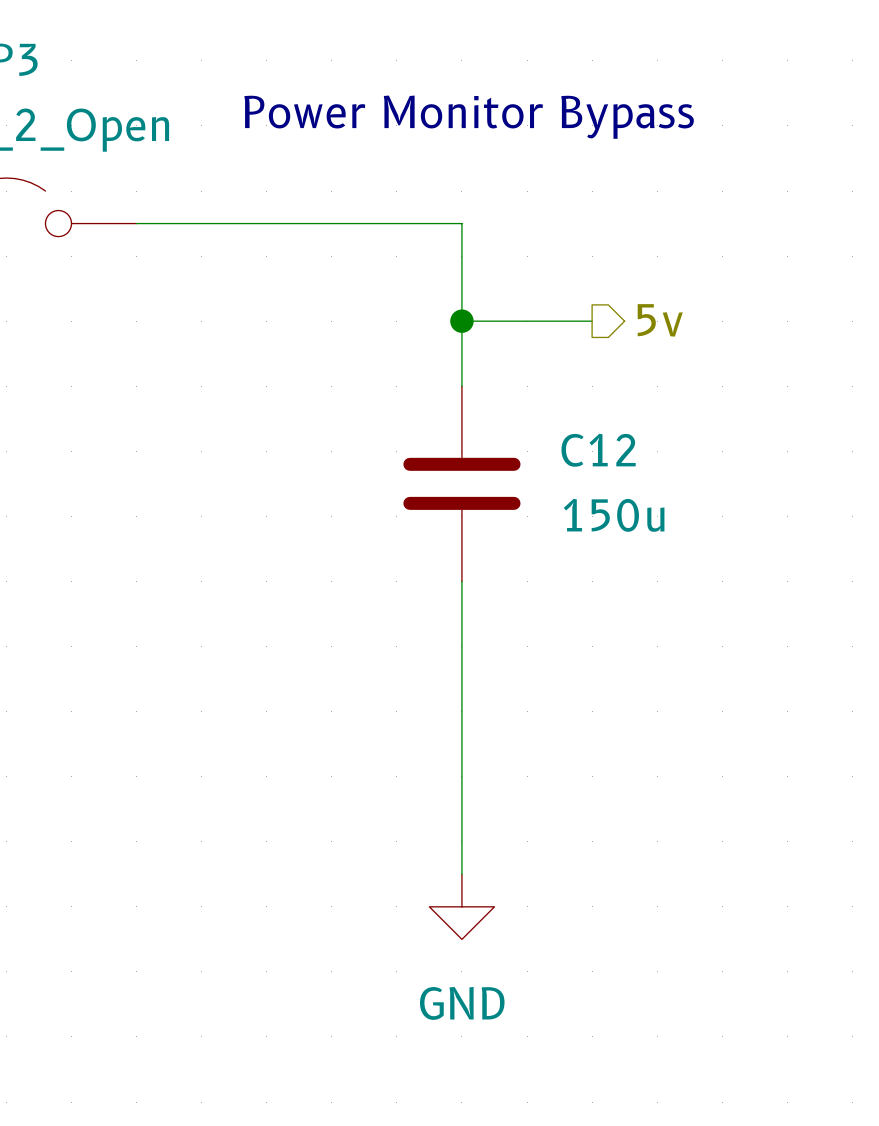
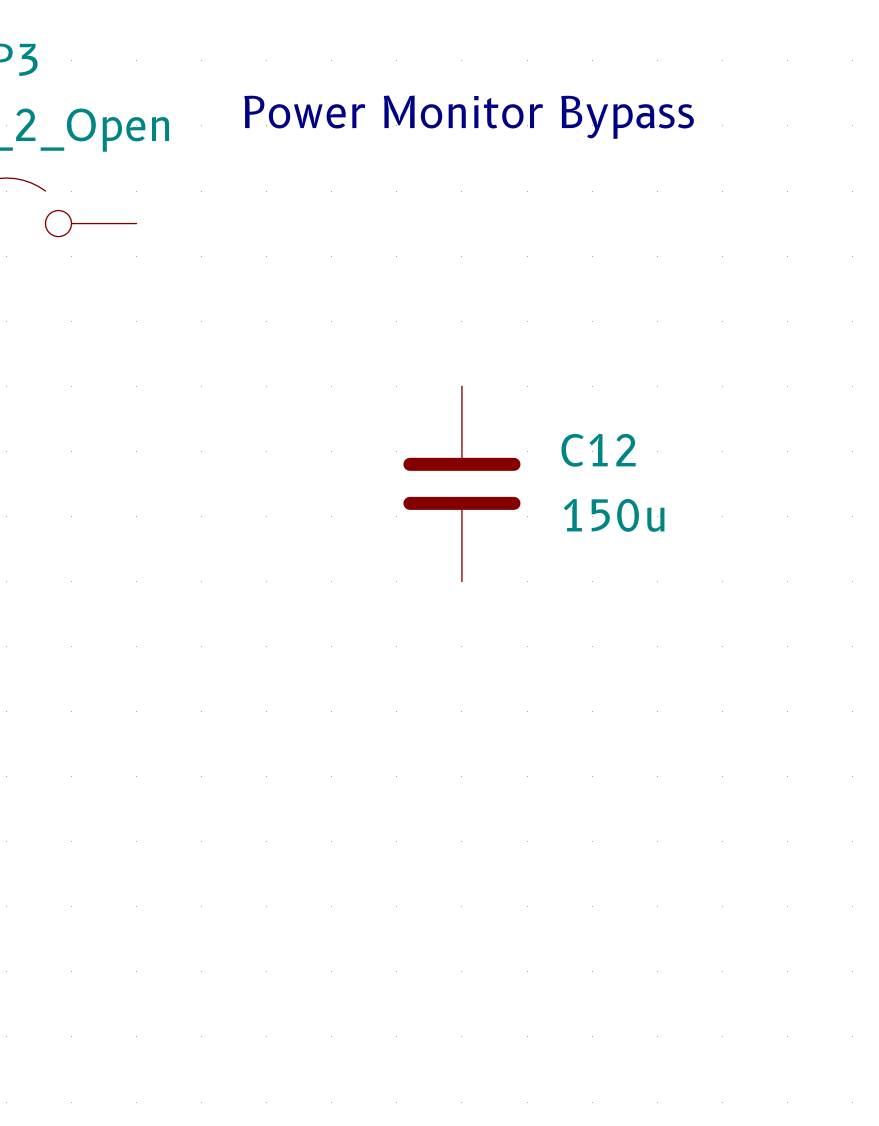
wire: (136, 223) (461, 223) (461, 386) -> none
hierarchical label: 5v (660, 320) -> none
wire: (461, 321) (592, 321) -> none
junction: (461, 321) -> none
wire: (461, 581) (461, 874) -> none
power symbol: GND (461, 906) -> none

